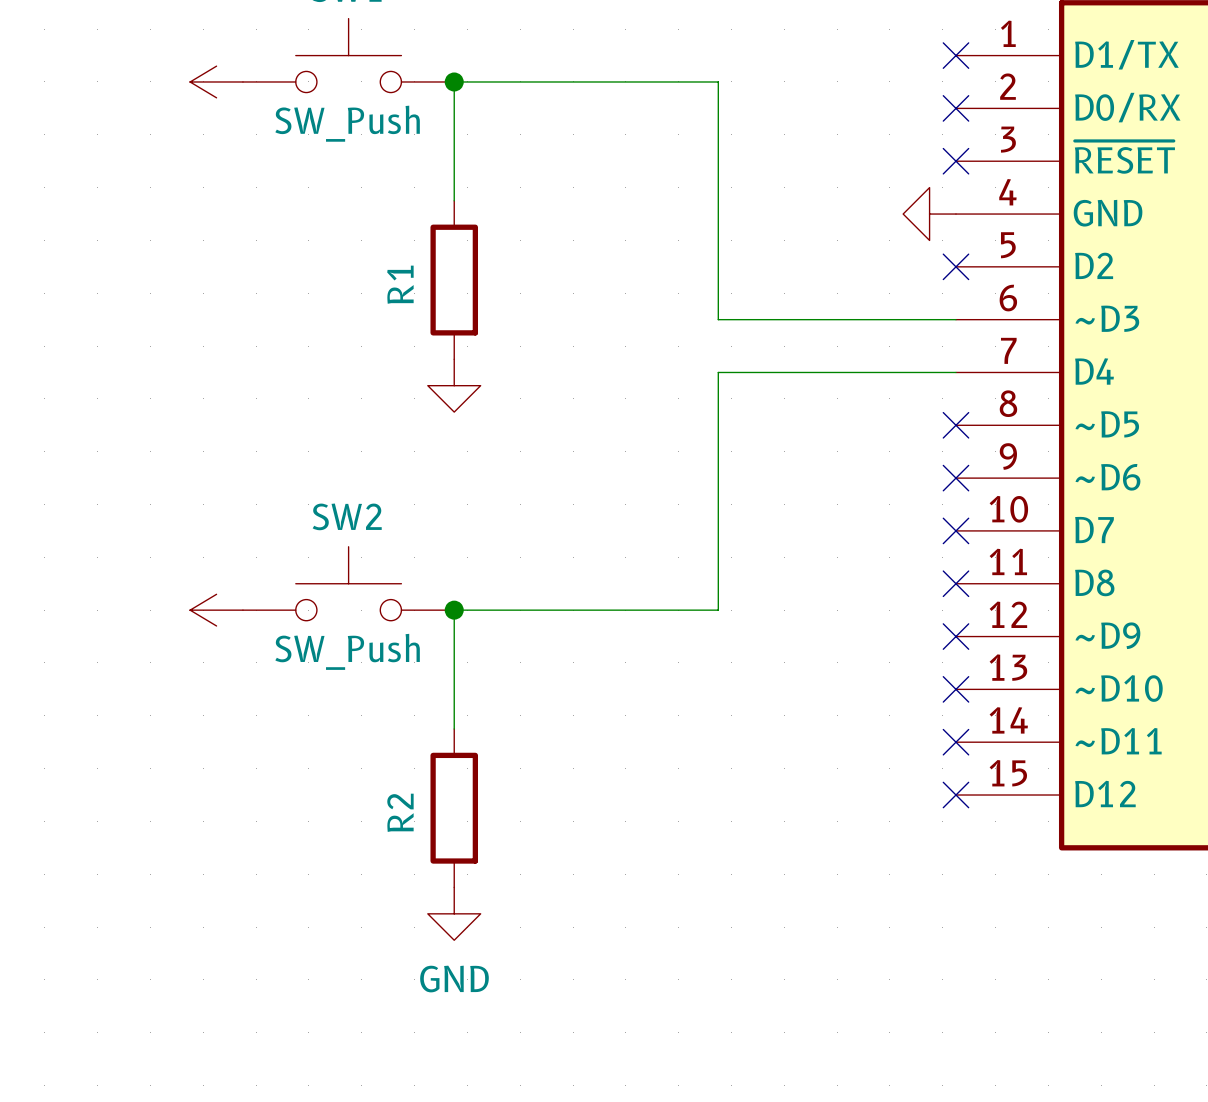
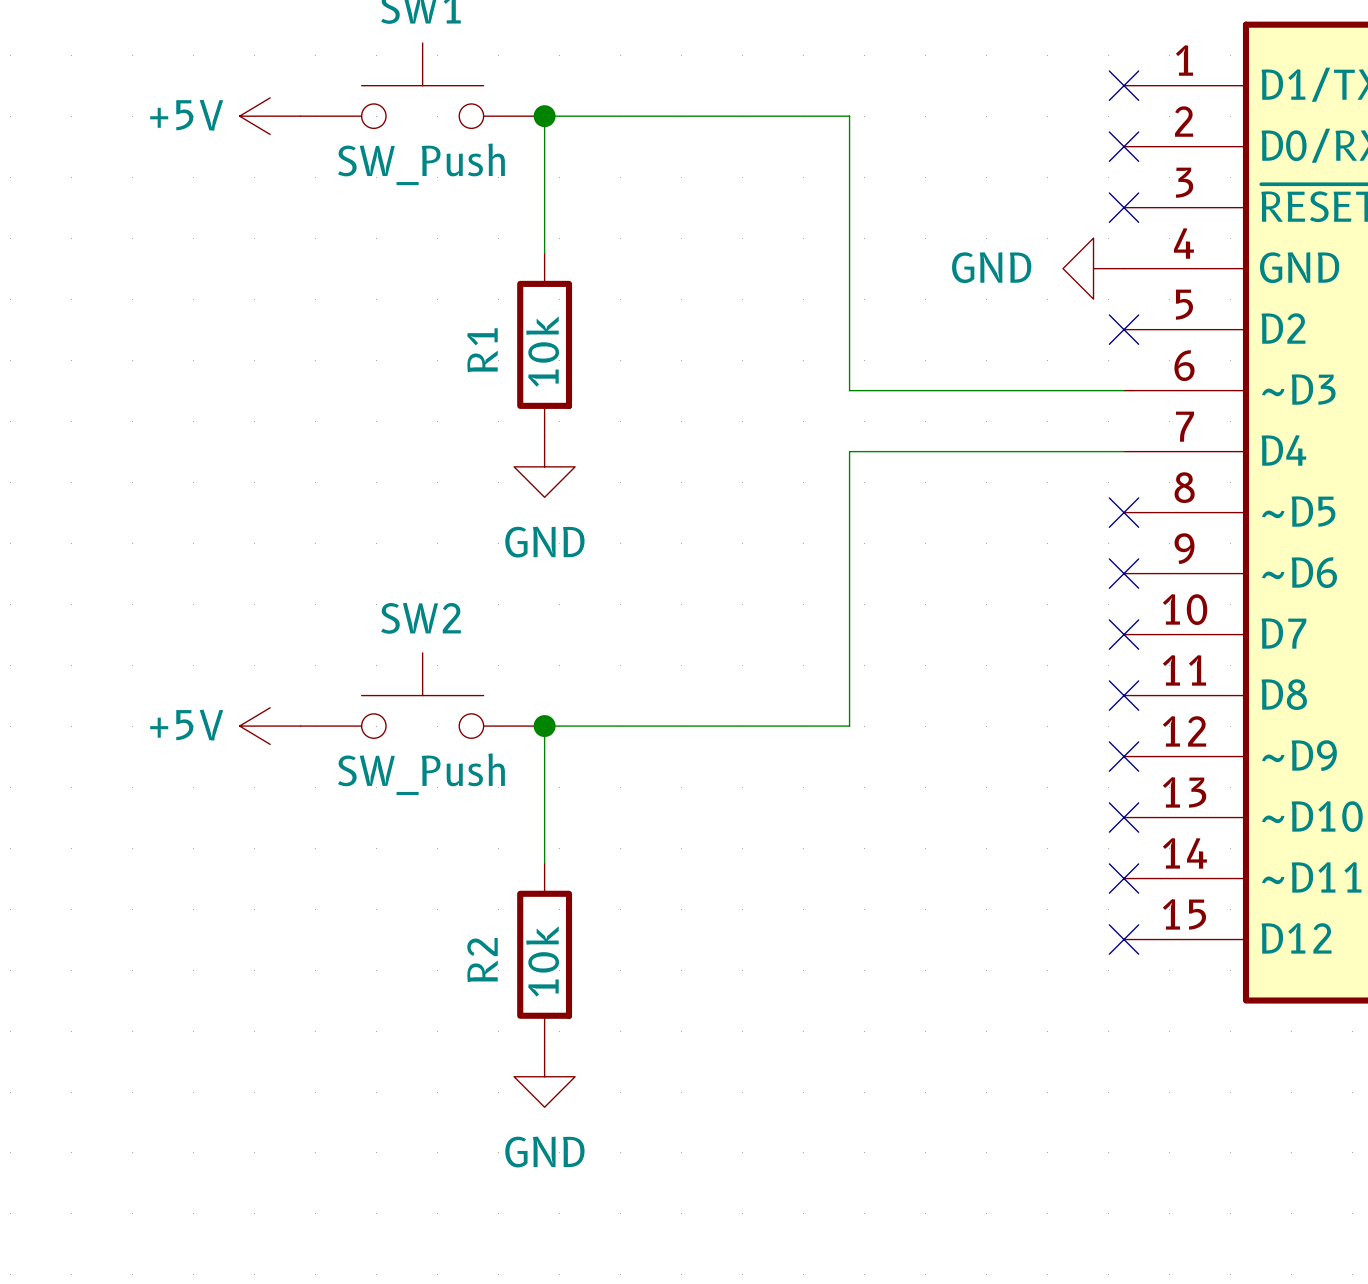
power symbol text: none -> +5V (186, 115)
power symbol text: none -> GND (991, 267)
R1 value: none -> 10k (542, 351)
power symbol text: none -> GND (544, 542)
power symbol text: none -> +5V (186, 725)
R2 value: none -> 10k (542, 961)

